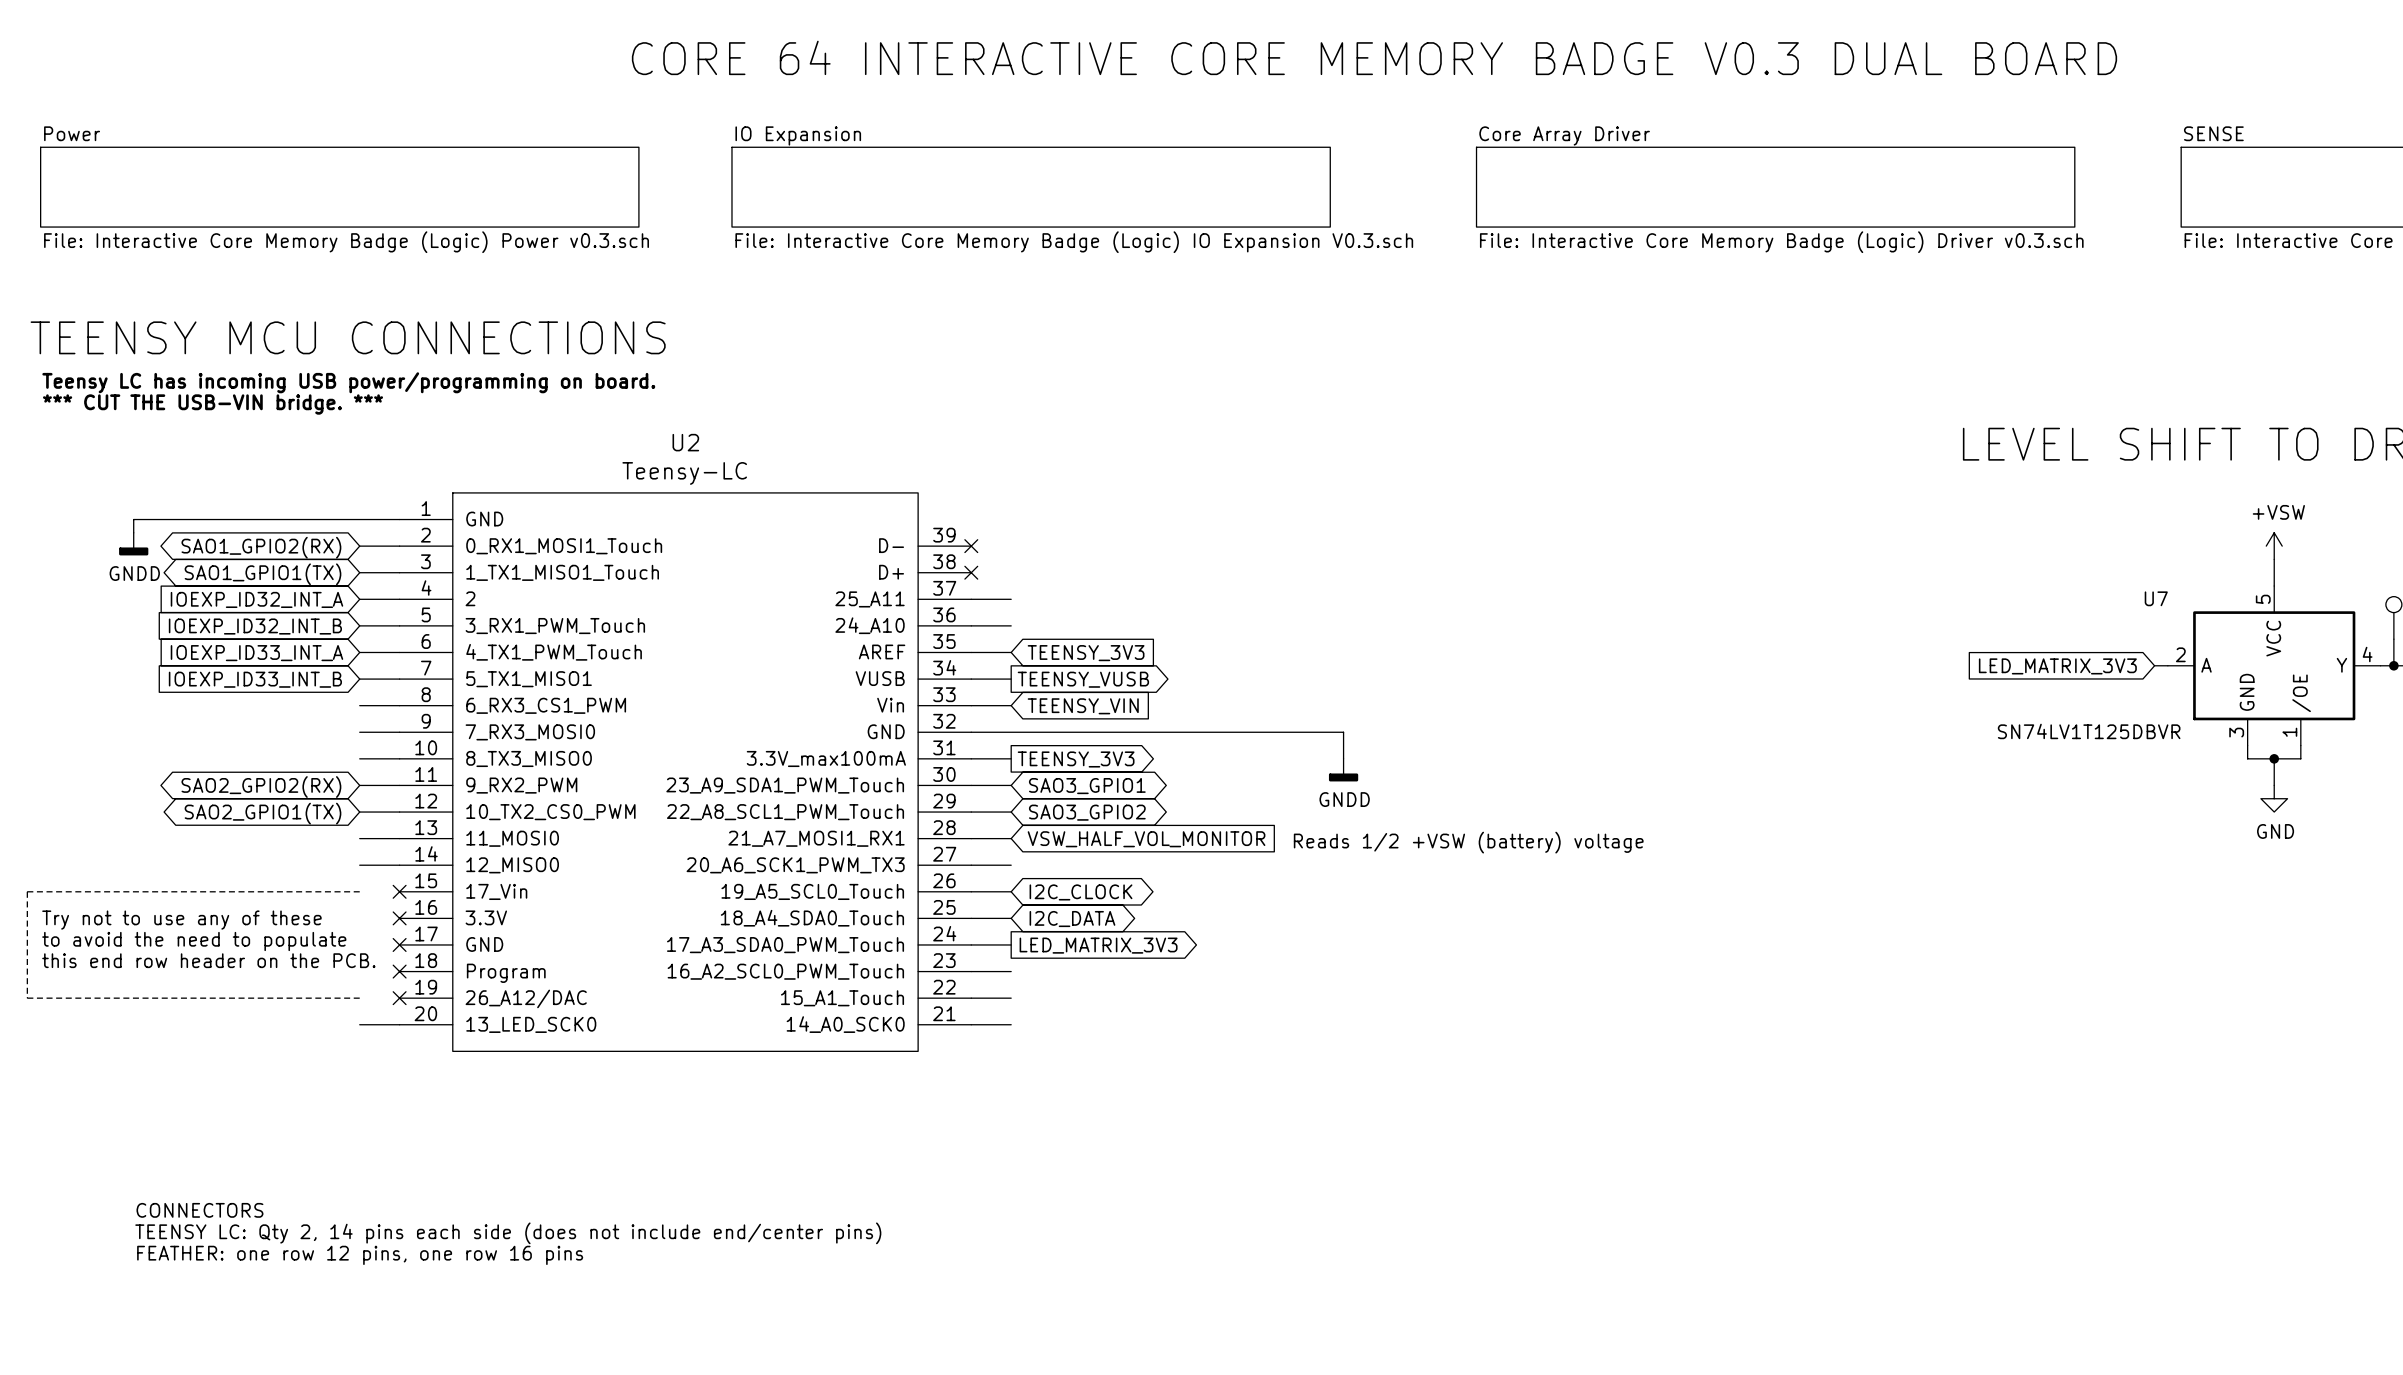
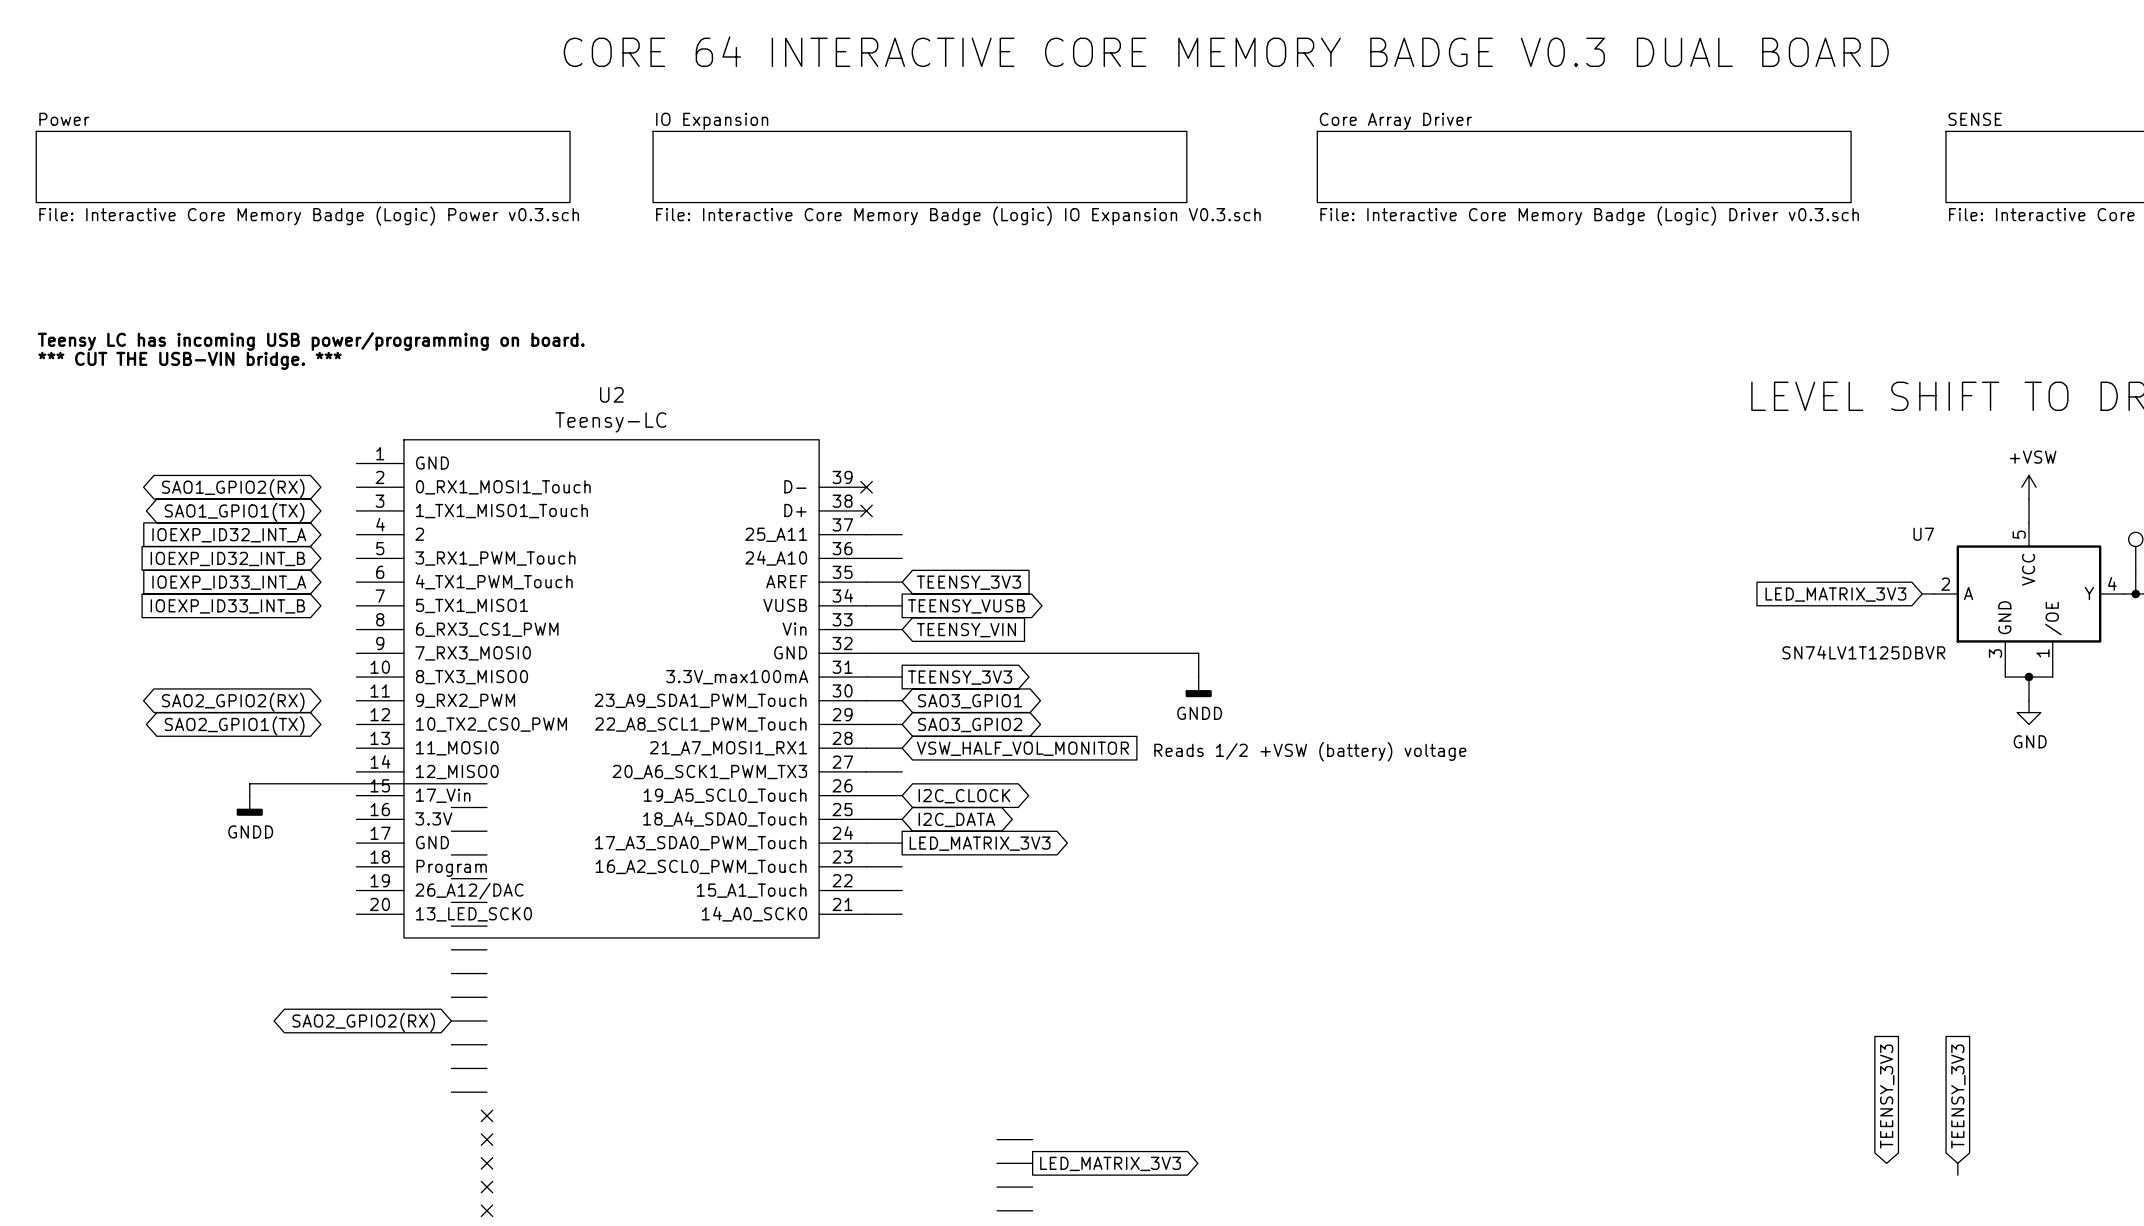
text: TEENSY MCU CONNECTIONS (348, 337) -> none
wire: (399, 519) (133, 519) (133, 532) -> none
power symbol: GNDD (133, 544) -> none
wire: (359, 546) (399, 546) -> none
wire: (359, 572) (399, 572) -> none
wire: (359, 599) (399, 599) -> none
wire: (359, 625) (399, 625) -> none
wire: (359, 652) (399, 652) -> none
wire: (359, 679) (399, 679) -> none
wire: (359, 705) (399, 705) -> (451, 807) (486, 807)
wire: (359, 732) (399, 732) -> (451, 831) (486, 831)
wire: (359, 758) (399, 758) -> (451, 854) (486, 854)
wire: (359, 785) (399, 785) -> (451, 878) (486, 878)
wire: (359, 812) (399, 812) -> (451, 902) (486, 902)
wire: (359, 838) (399, 838) -> (451, 926) (486, 926)
wire: (359, 865) (399, 865) -> (451, 949) (486, 949)
wire: none -> (486, 783) (249, 783) (249, 795)
line: (359, 891) (27, 891) (27, 998) (359, 998) -> none
no-connect mark: (399, 891) -> none
power symbol: none -> GNDD (249, 805)
no-connect mark: (399, 918) -> none
text: Try not to use any of these (181, 920) -> none
text: to avoid the need to populate (194, 941) -> none
no-connect mark: (399, 944) -> none
text: this end row header on the PCB. (208, 960) -> none
no-connect mark: (399, 971) -> none
no-connect mark: (399, 998) -> none
wire: (359, 1024) (399, 1024) -> (451, 1092) (486, 1092)
wire: none -> (451, 973) (486, 973)
wire: none -> (451, 997) (486, 997)
wire: none -> (451, 1021) (486, 1021)
global label: none -> SAO2_GPIO2(RX) (363, 1022)
wire: none -> (451, 1044) (486, 1044)
wire: none -> (451, 1068) (486, 1068)
text: CONNECTORS (199, 1210) -> none
global label: none -> TEENSY_3V3 (1887, 1096)
global label: none -> TEENSY_3V3 (1958, 1096)
text: TEENSY LC: Qty 2, 14 pins each side (does not include end/center pins) (508, 1233) -> none
no-connect mark: none -> (486, 1115)
text: FEATHER: one row 12 pins, one row 16 pins (360, 1255) -> none
no-connect mark: none -> (486, 1139)
wire: none -> (997, 1139) (1032, 1139)
no-connect mark: none -> (486, 1163)
wire: none -> (997, 1163) (1032, 1163)
wire: none -> (1957, 1163) (1957, 1175)
global label: none -> LED_MATRIX_3V3 (1110, 1163)
no-connect mark: none -> (486, 1187)
wire: none -> (997, 1187) (1032, 1187)
no-connect mark: none -> (486, 1210)
wire: none -> (997, 1210) (1032, 1210)

